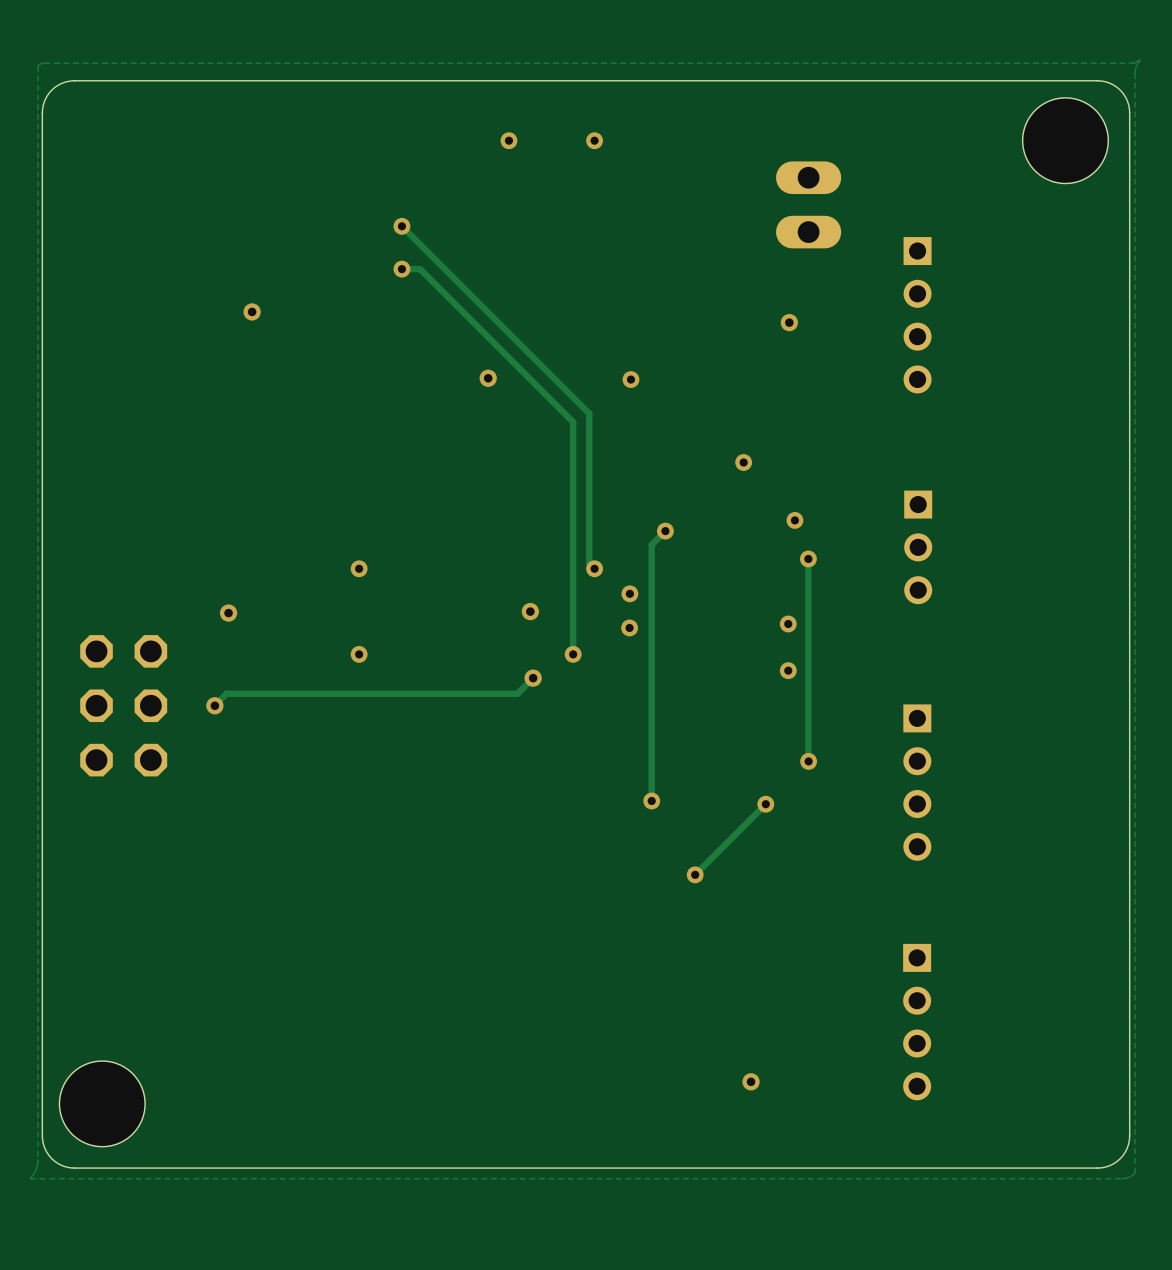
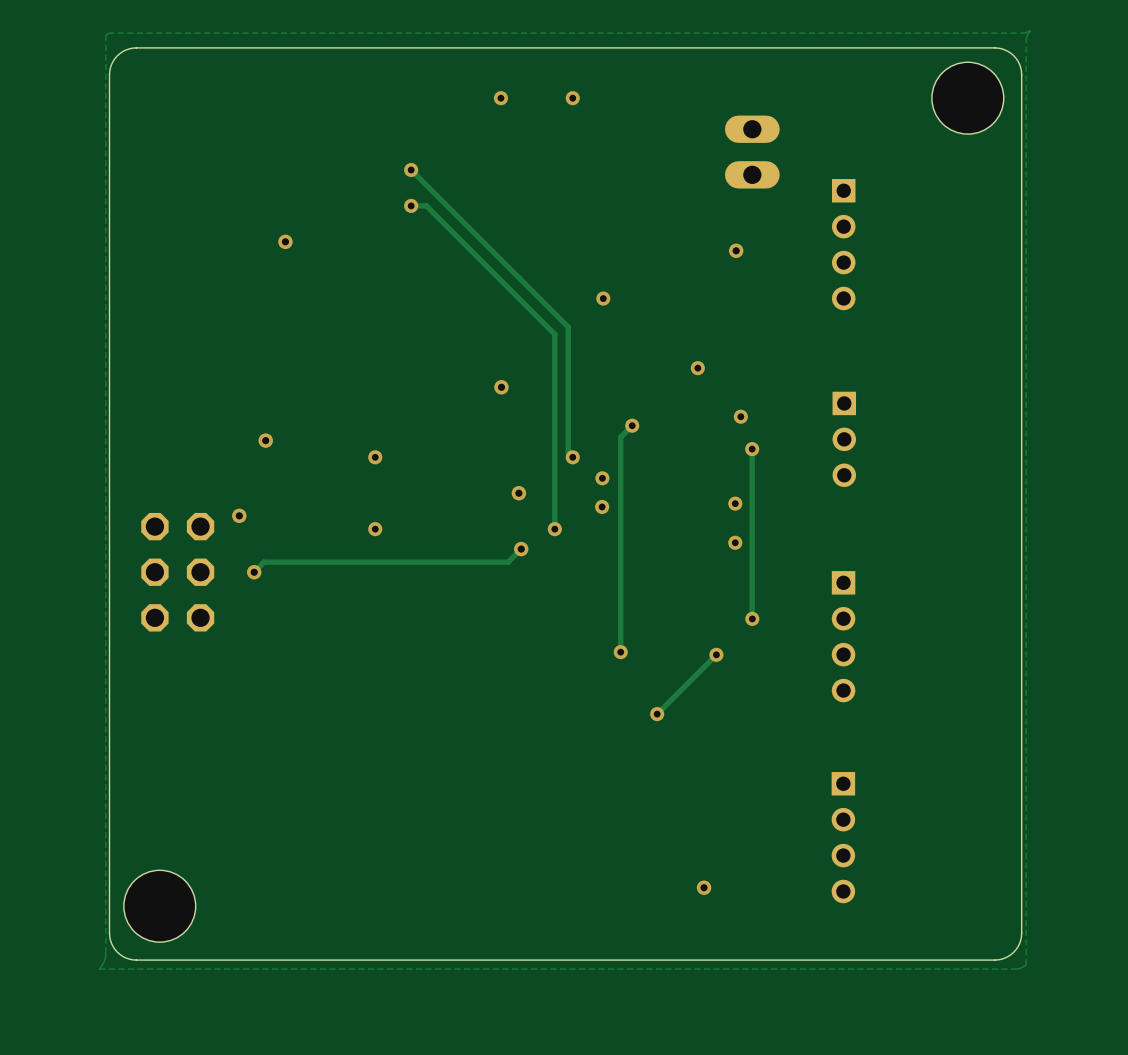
via position: (488, 378) -> (501, 387)
via: none -> (265, 440)
via: (228, 613) -> none
via: none -> (239, 515)

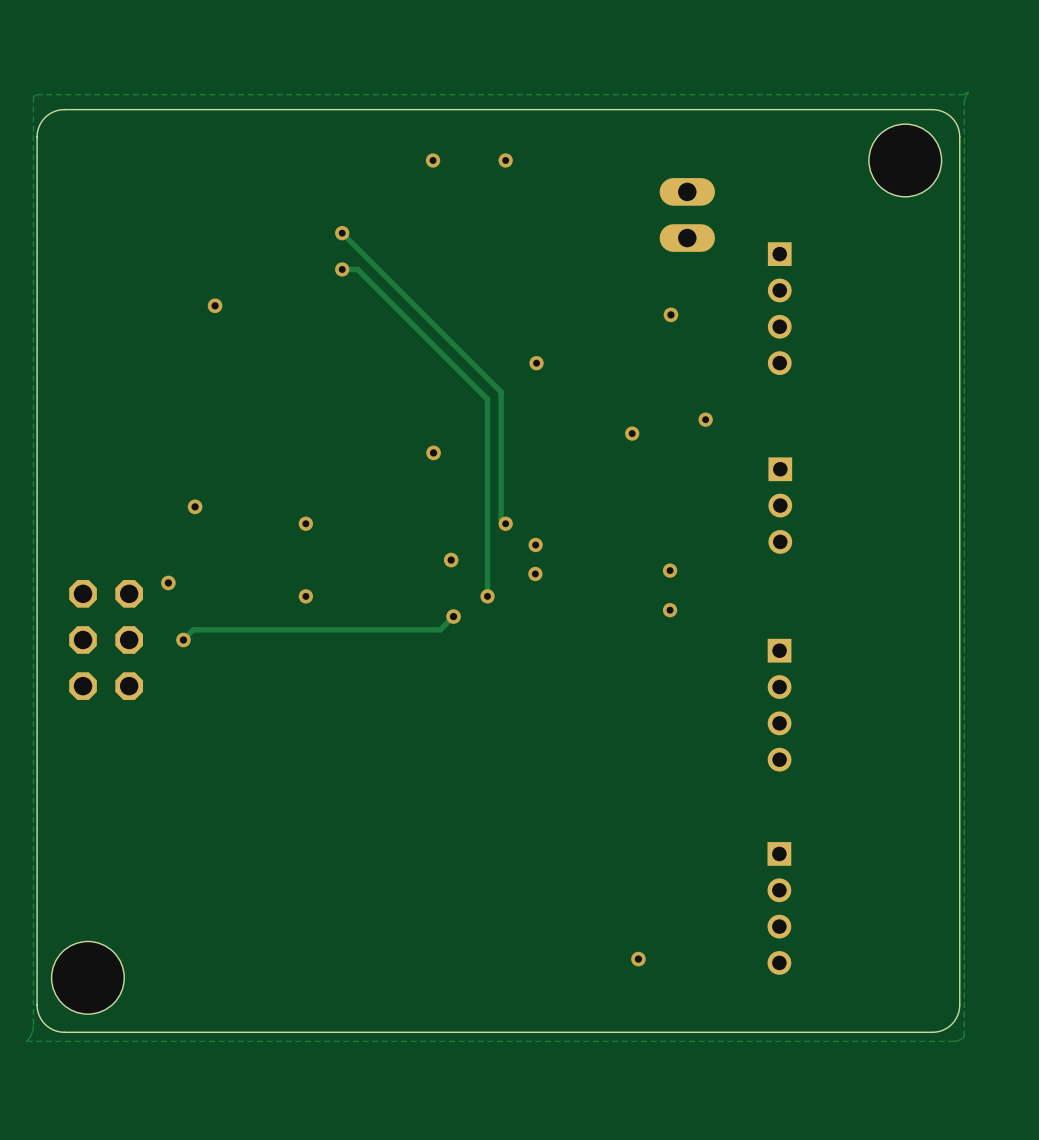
via: none -> (705, 419)
via: (740, 416) -> none
track: (632, 425) (620, 437) (620, 652) -> none
via: (632, 425) -> none
track: (752, 449) (752, 618) -> none
via: (752, 449) -> none
via: (752, 618) -> none
via: (620, 652) -> none
track: (716, 654) (657, 714) -> none
via: (716, 654) -> none
via: (657, 714) -> none

